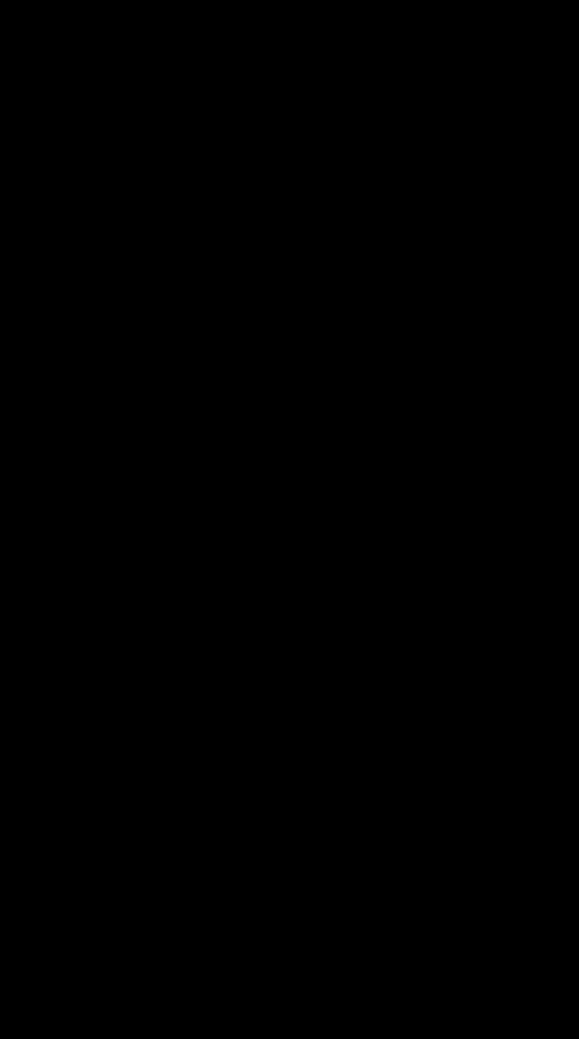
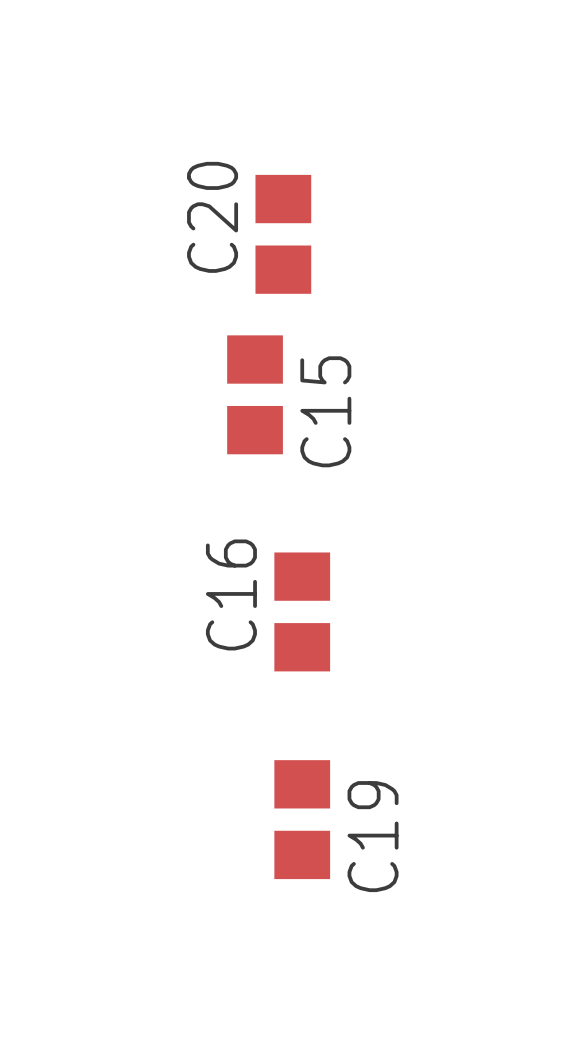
C20: none -> (283, 234)
C15: none -> (255, 394)
C16: none -> (302, 611)
C19: none -> (302, 819)

